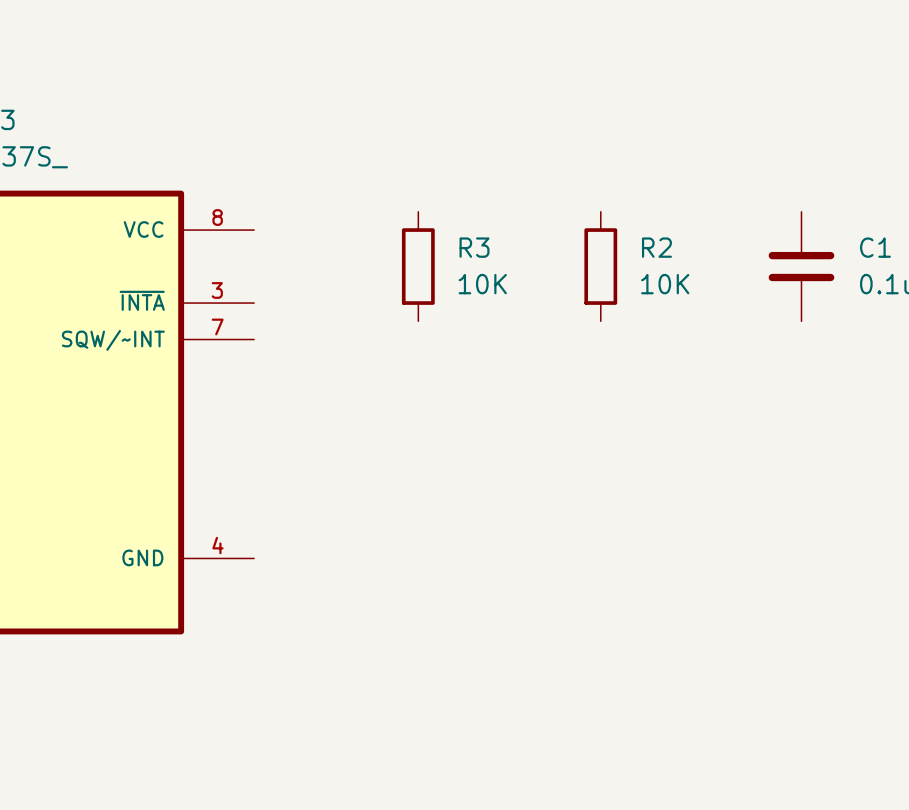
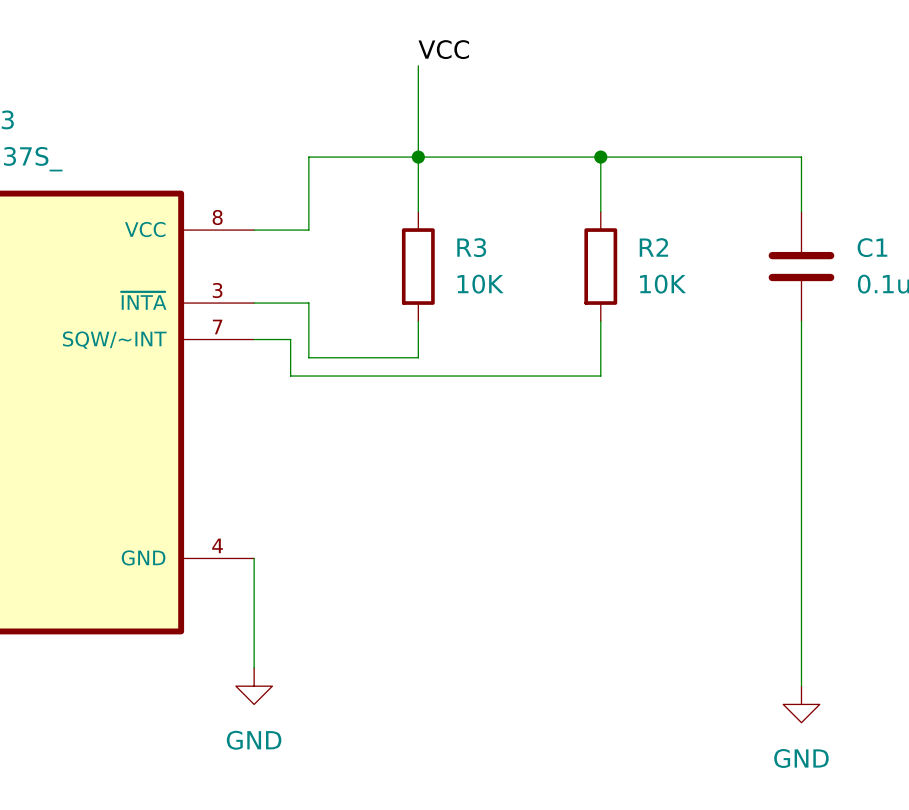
label: none -> VCC (443, 49)
wire: none -> (418, 65) (418, 211)
junction: none -> (418, 157)
wire: none -> (600, 157) (600, 211)
junction: none -> (600, 157)
wire: none -> (801, 211) (801, 157) (308, 157) (308, 230) (254, 230)
wire: none -> (254, 303) (308, 303) (308, 357) (418, 357) (418, 321)
wire: none -> (600, 321) (600, 376) (290, 376) (290, 339) (254, 339)
wire: none -> (801, 321) (801, 686)
wire: none -> (254, 558) (254, 667)
power symbol: none -> GND (254, 686)
power symbol: none -> GND (801, 704)

